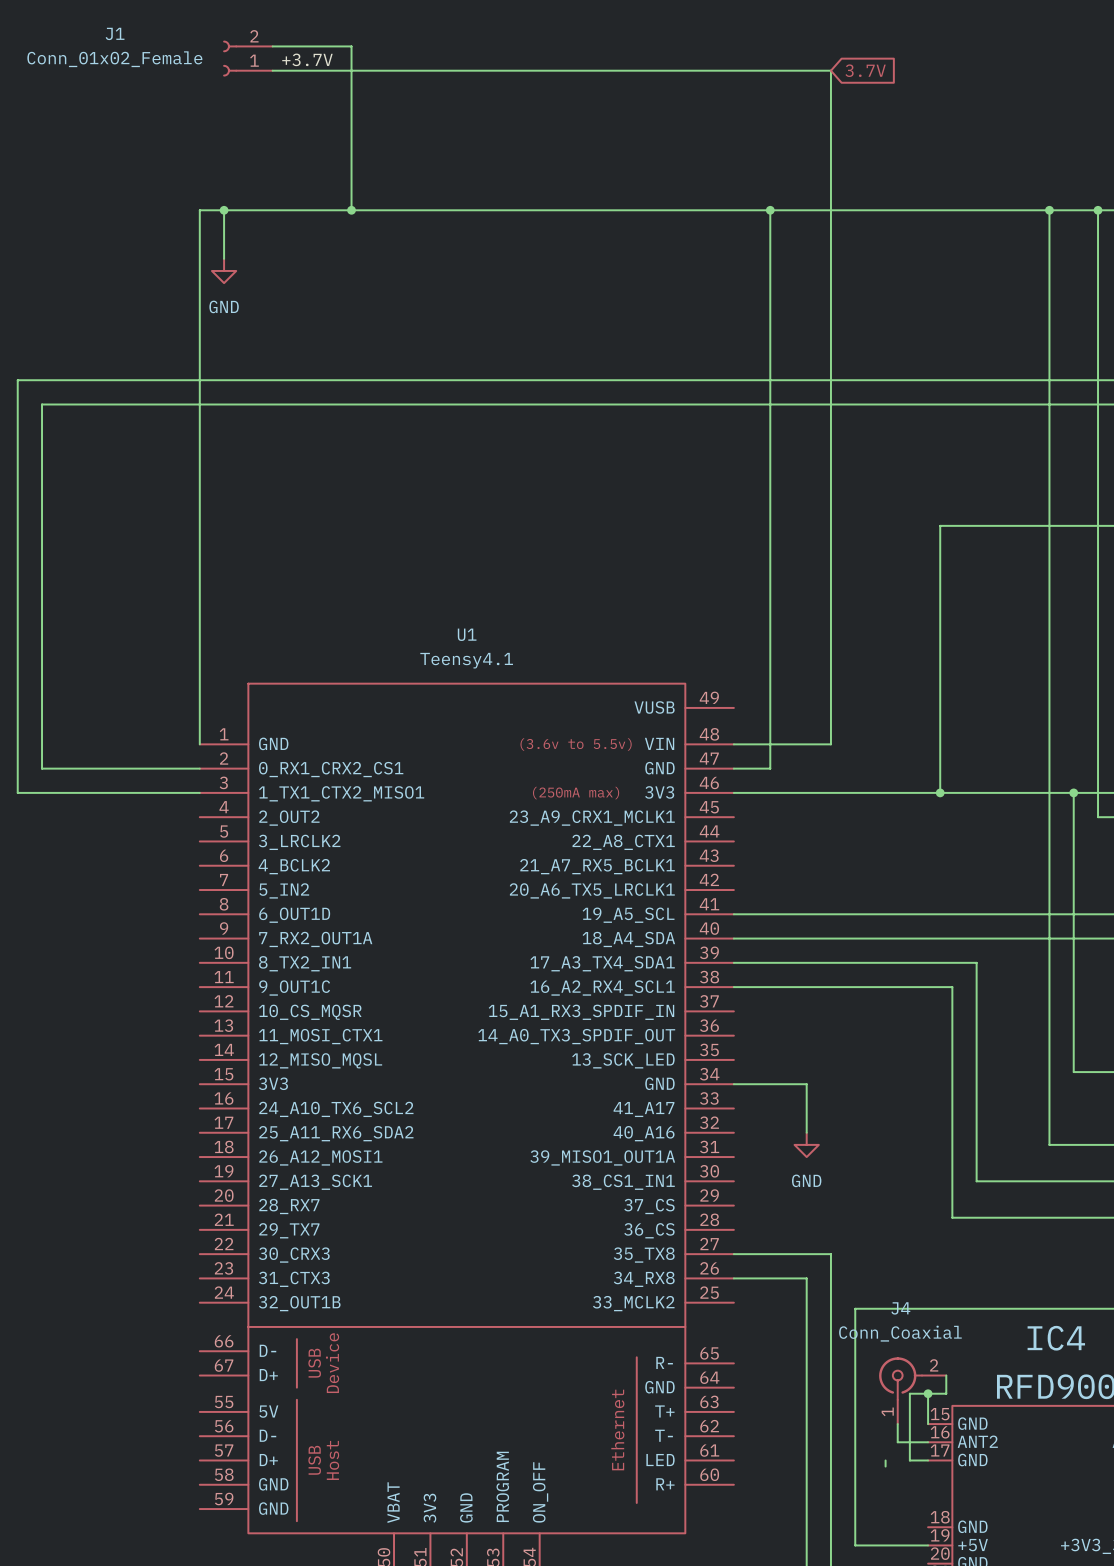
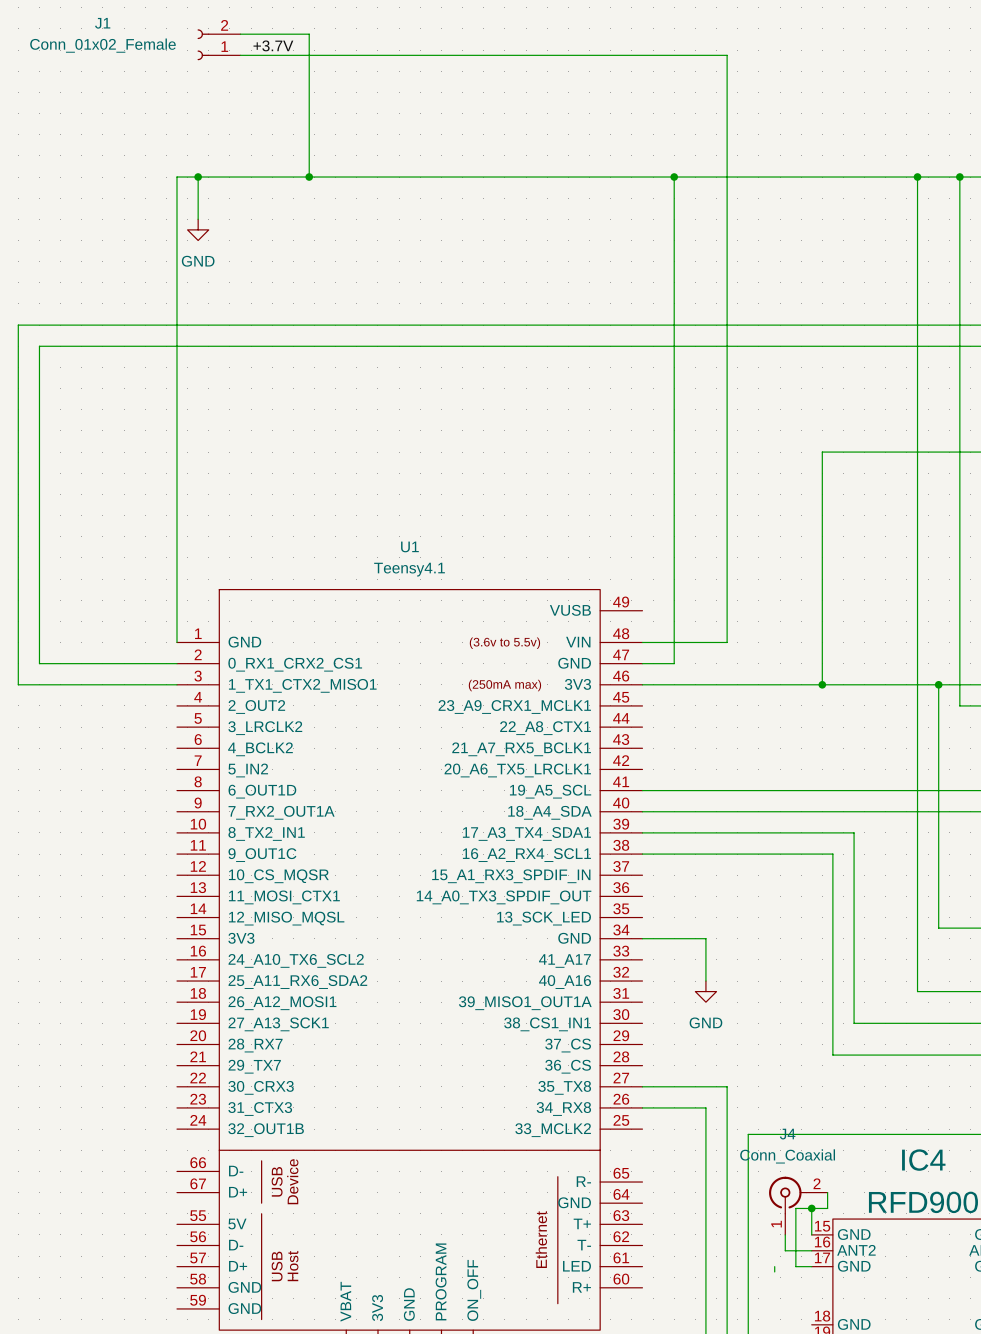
global label: 3.7V (865, 70) -> none

